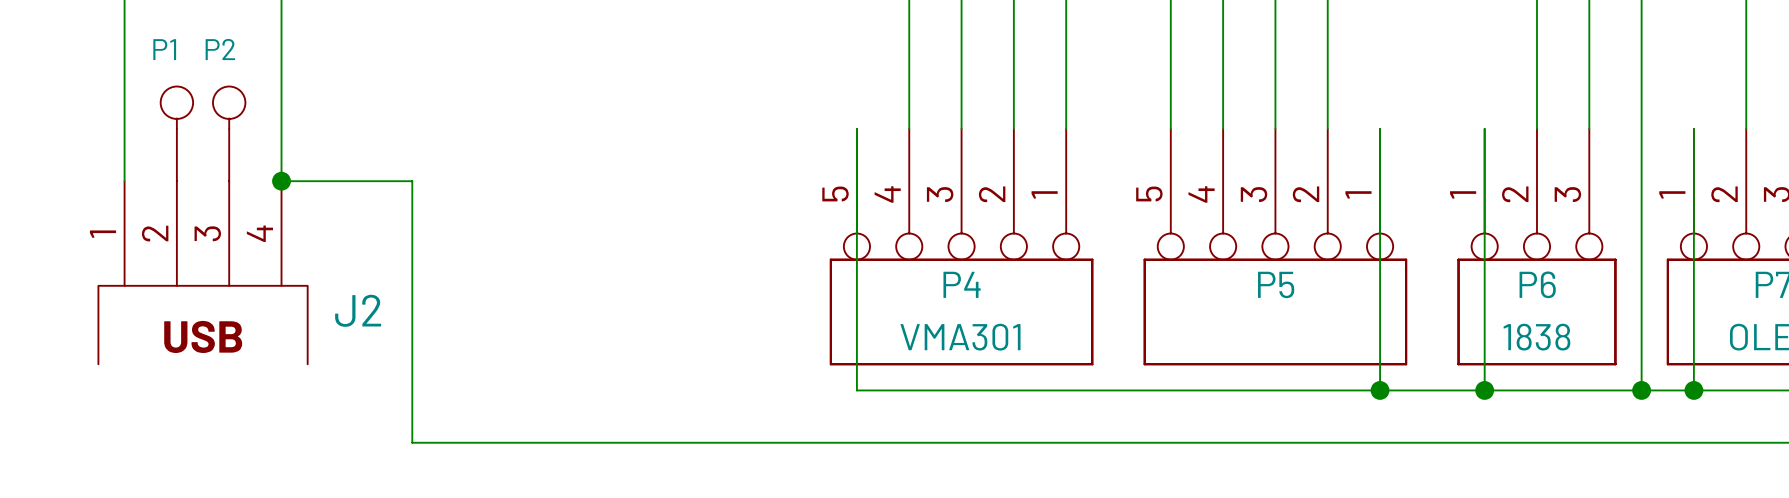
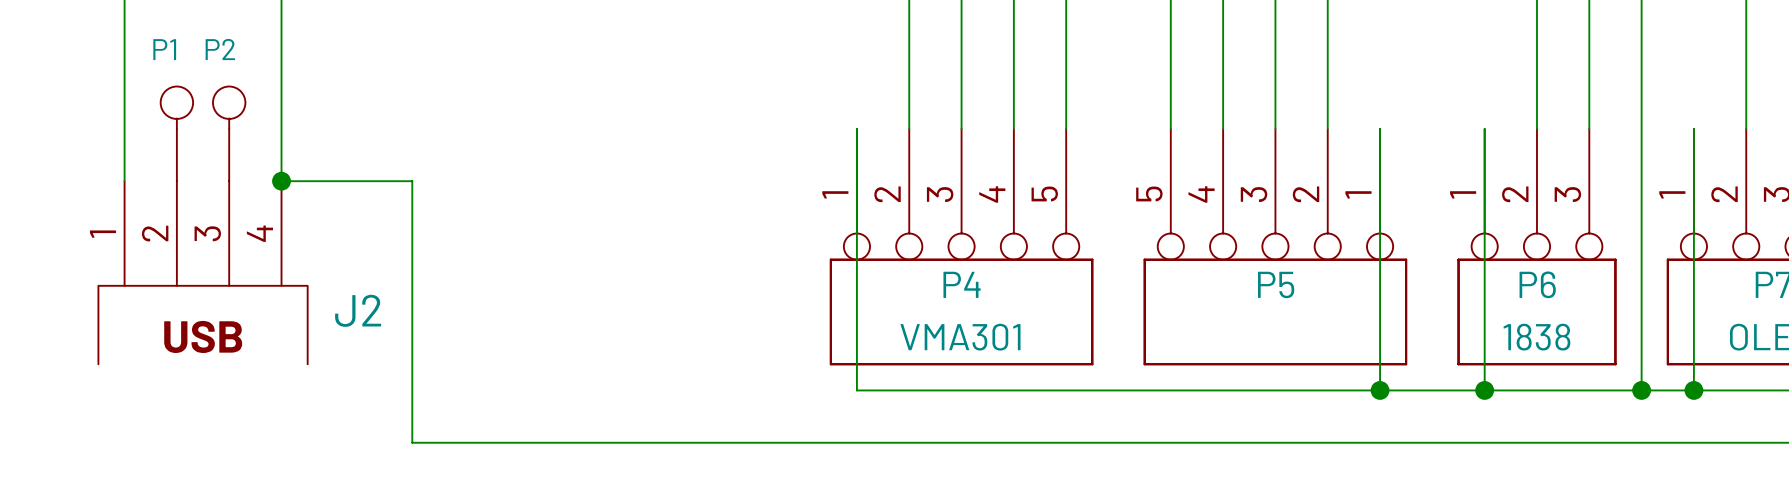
P4 flip: as is (961, 311) -> left-right (961, 311)

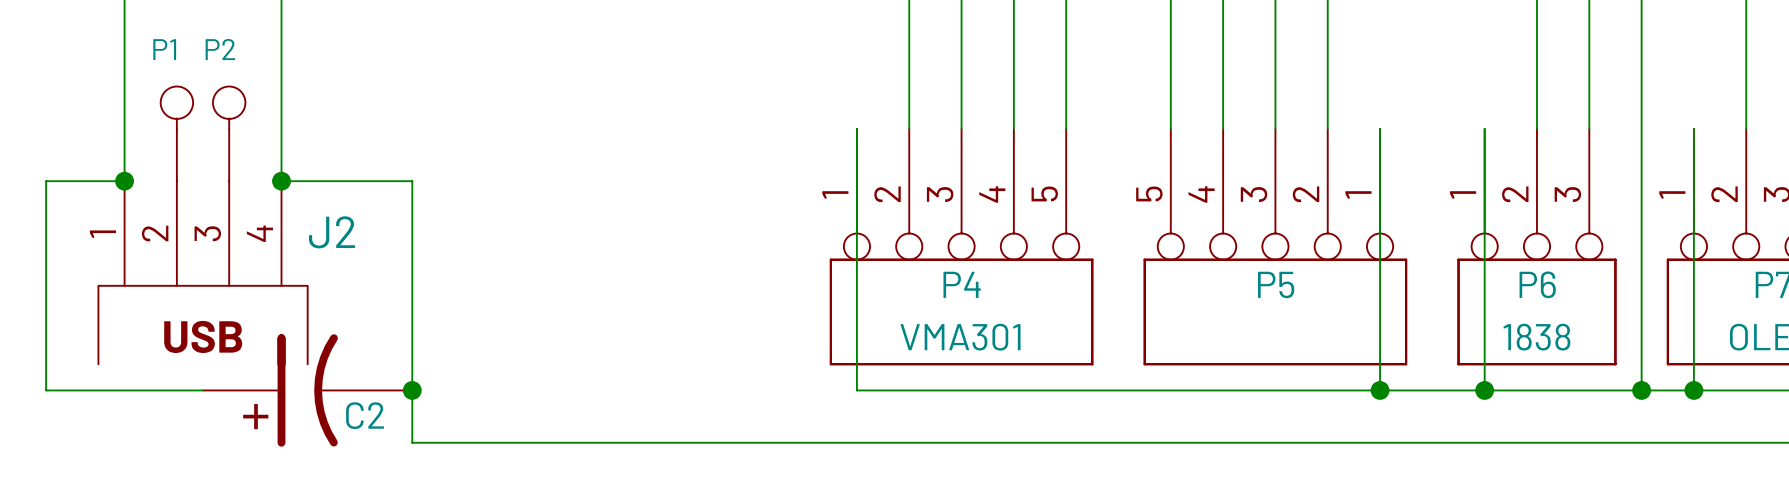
wire: none -> (124, 181) (46, 181) (46, 390) (203, 390)
junction: none -> (124, 181)
J2 name position: J2 (358, 310) -> J2 (331, 232)
C2: none -> (307, 390)
junction: none -> (412, 390)

